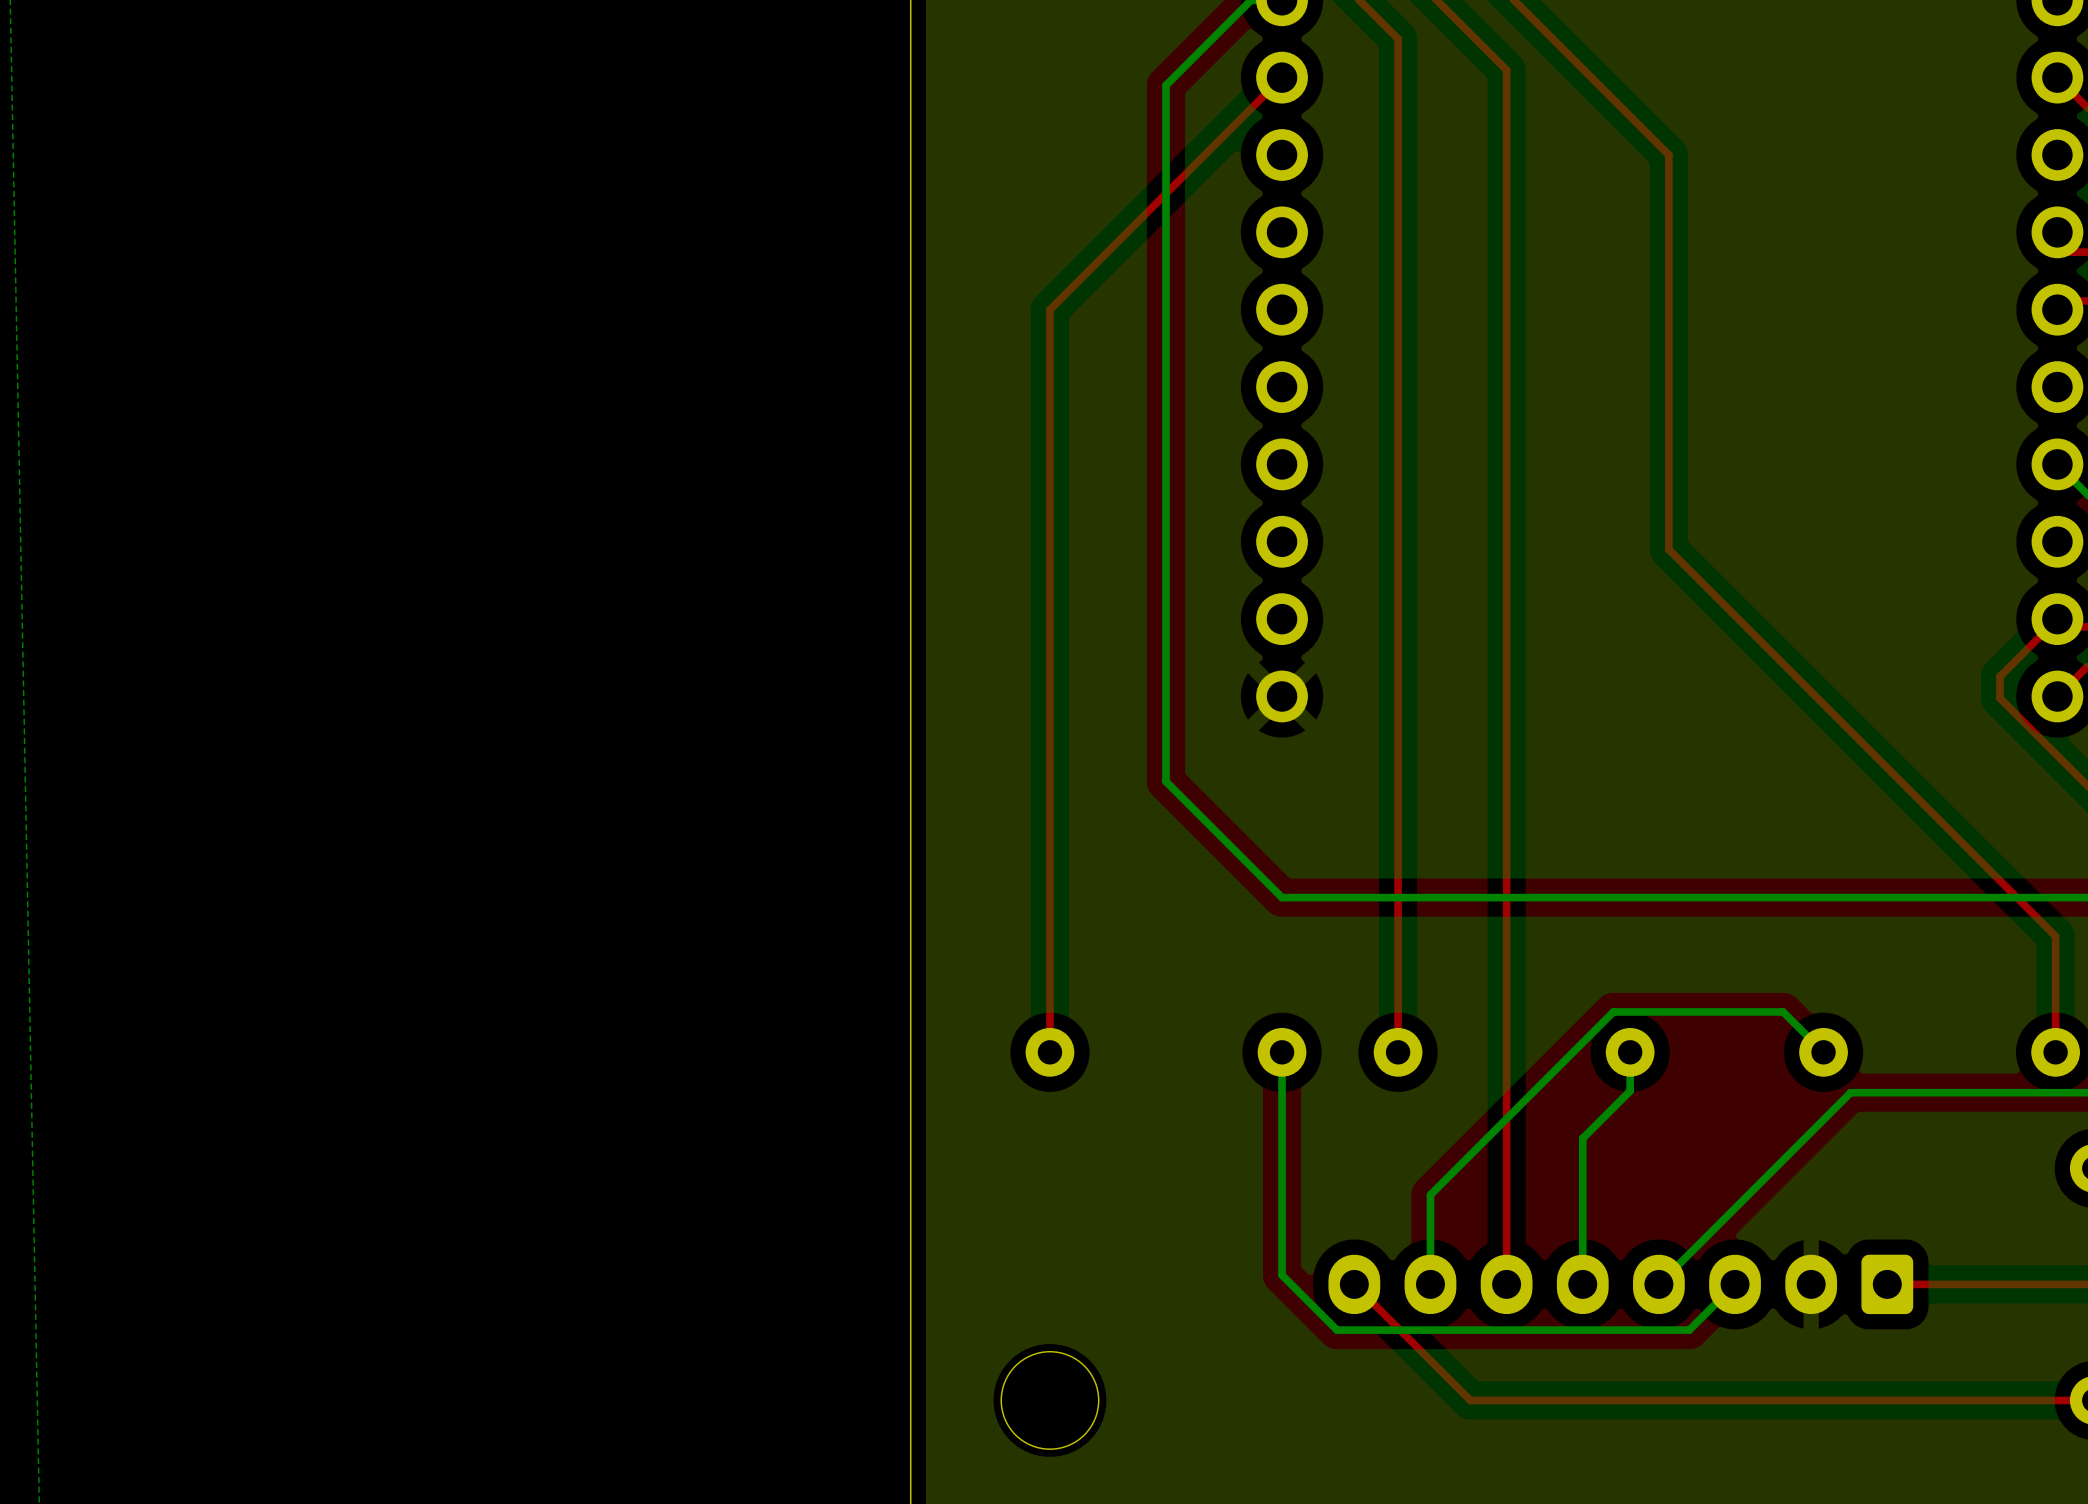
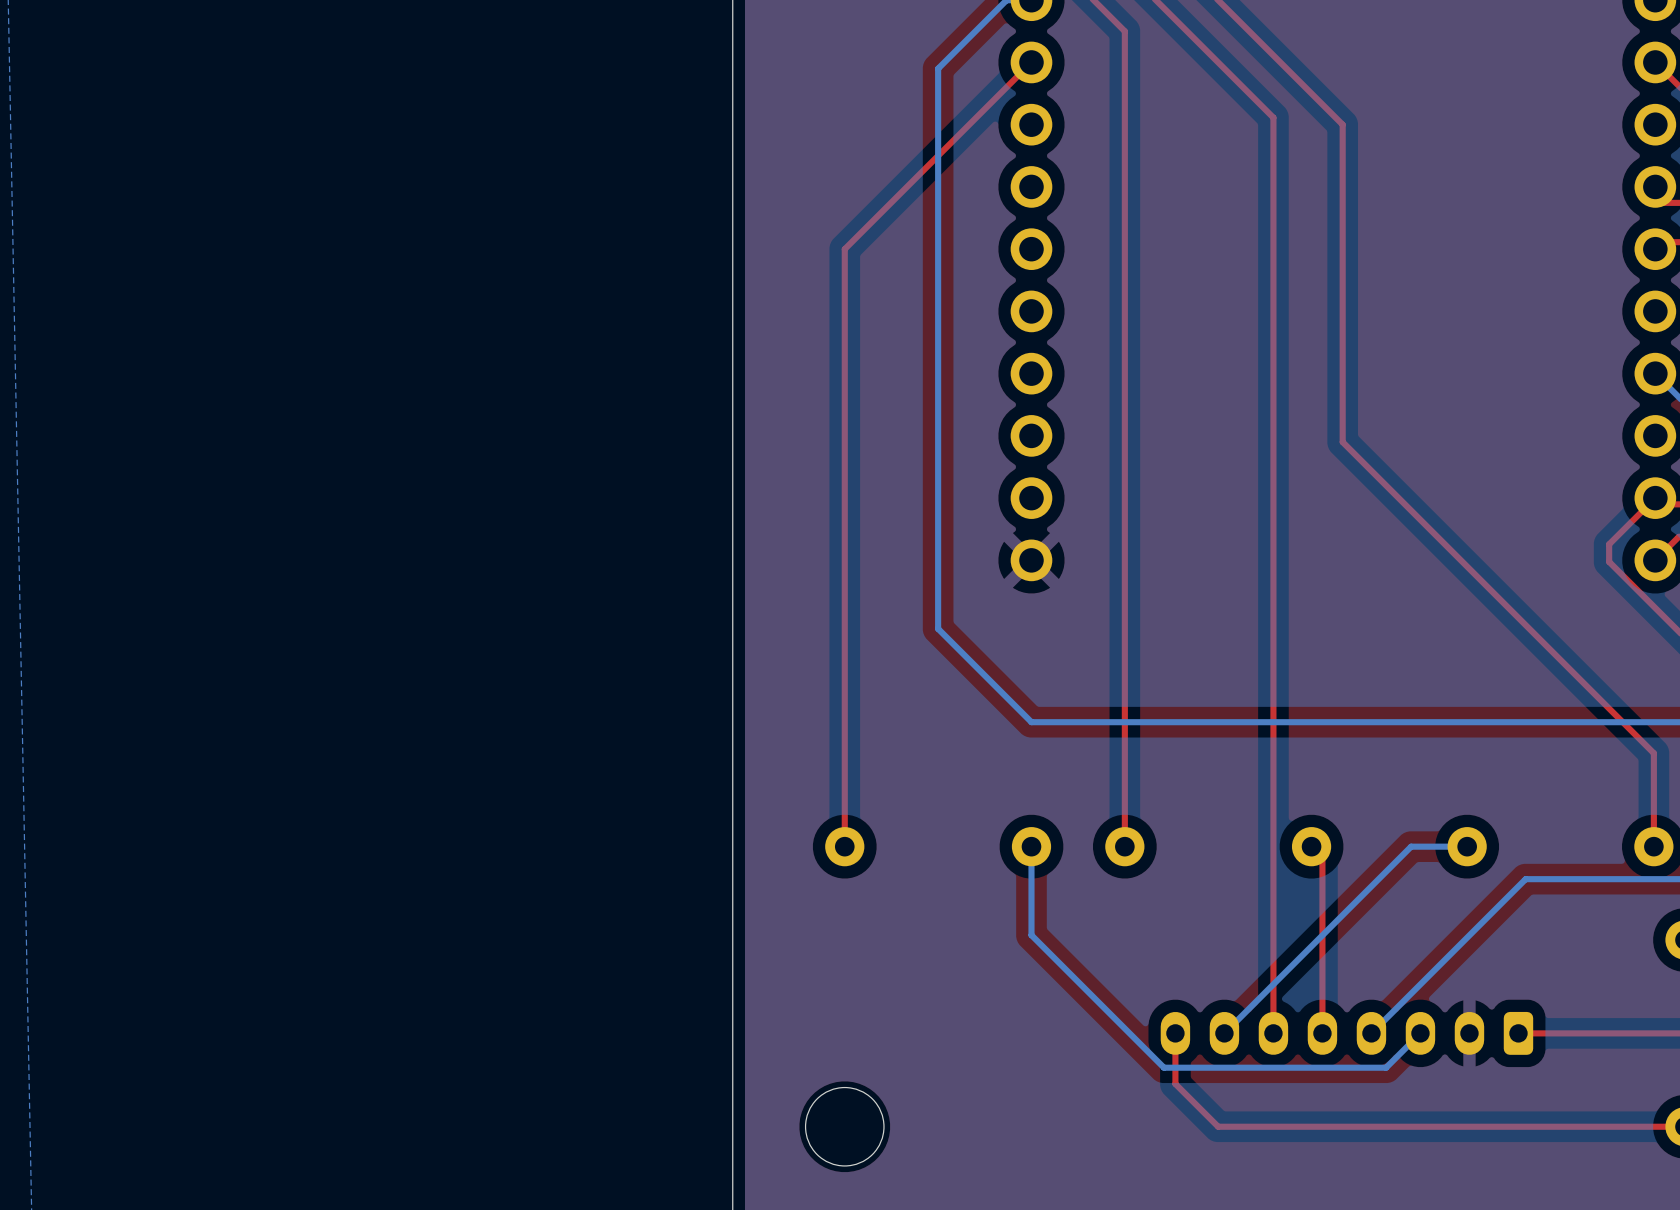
top track: (1506, 70) (1506, 1284) -> (1212, 56) (1273, 117) (1273, 1033)
bottom track: (1630, 1052) (1630, 1091) (1582, 1138) (1582, 1284) -> none
bottom track: (1823, 1052) (1783, 1011) (1613, 1011) (1430, 1194) (1430, 1284) -> (1467, 846) (1411, 846) (1224, 1033)
top track: none -> (1322, 857) (1322, 1033)
bottom track: (1896, 1092) (1850, 1092) (1658, 1284) -> (1525, 879) (1371, 1033)
bottom track: (1282, 1162) (1282, 1275) (1336, 1330) (1689, 1330) (1735, 1284) -> (1031, 935) (1163, 1067) (1386, 1067) (1420, 1033)
top track: (1354, 1284) (1470, 1400) (1514, 1400) -> (1175, 1033) (1175, 1083) (1218, 1126)
part: (1620, 1284) -> none
part: none -> (1346, 1033)

